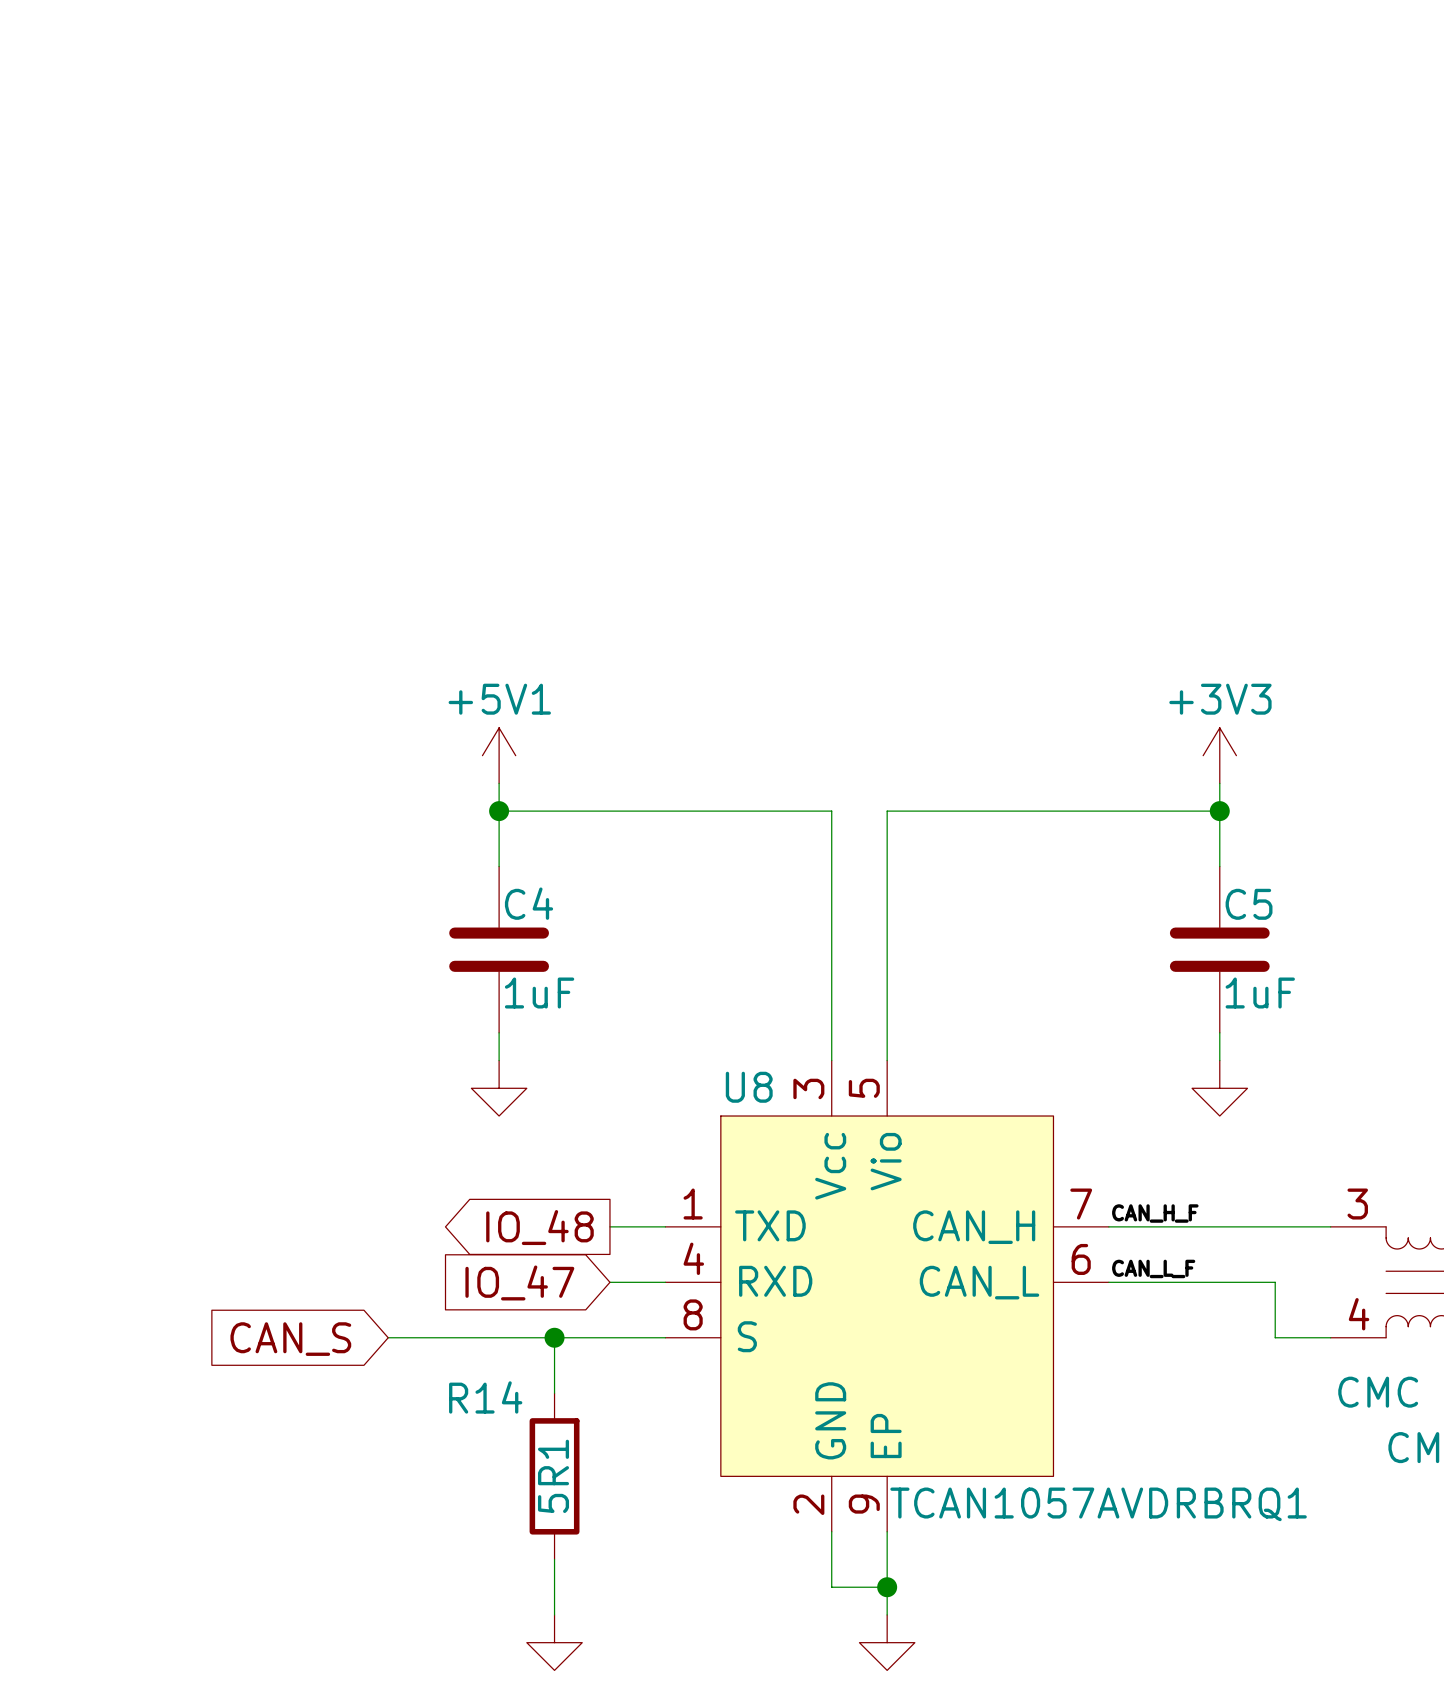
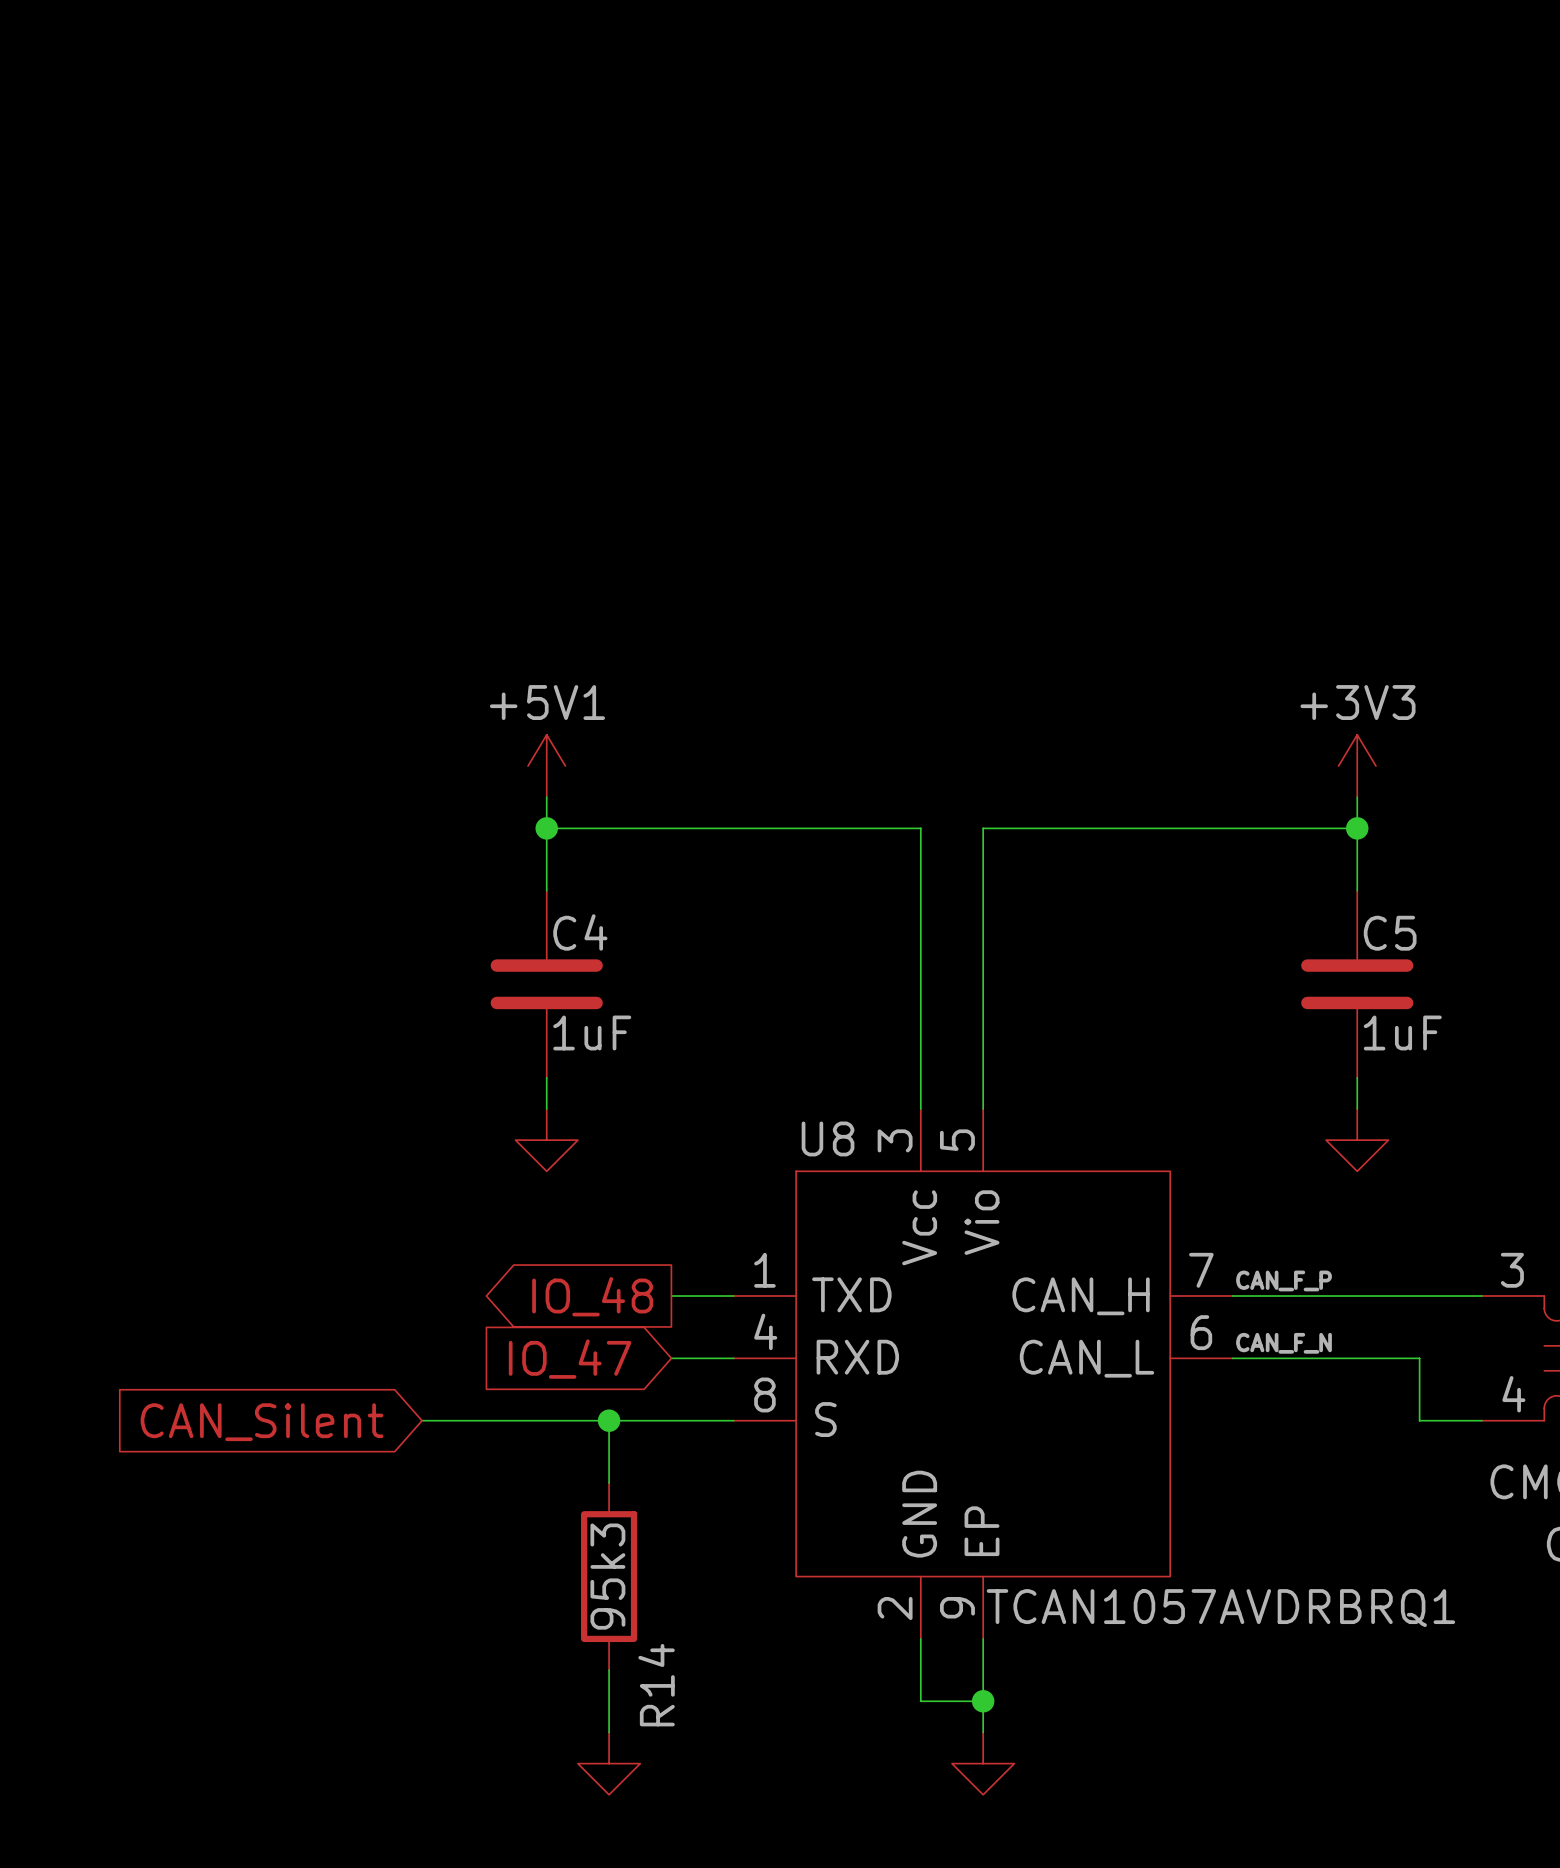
label: CAN_H_F (1155, 1213) -> CAN_F_P (1284, 1280)
label: CAN_L_F (1153, 1268) -> CAN_F_N (1284, 1343)
global label: CAN_S (290, 1339) -> CAN_Silent (262, 1422)
R14 name rotation: 0° (485, 1397) -> 90° counterclockwise (656, 1685)
R14 name position: R14 (485, 1397) -> R14 (656, 1685)
R14 value: 5R1 (553, 1476) -> 95k3 (607, 1576)

